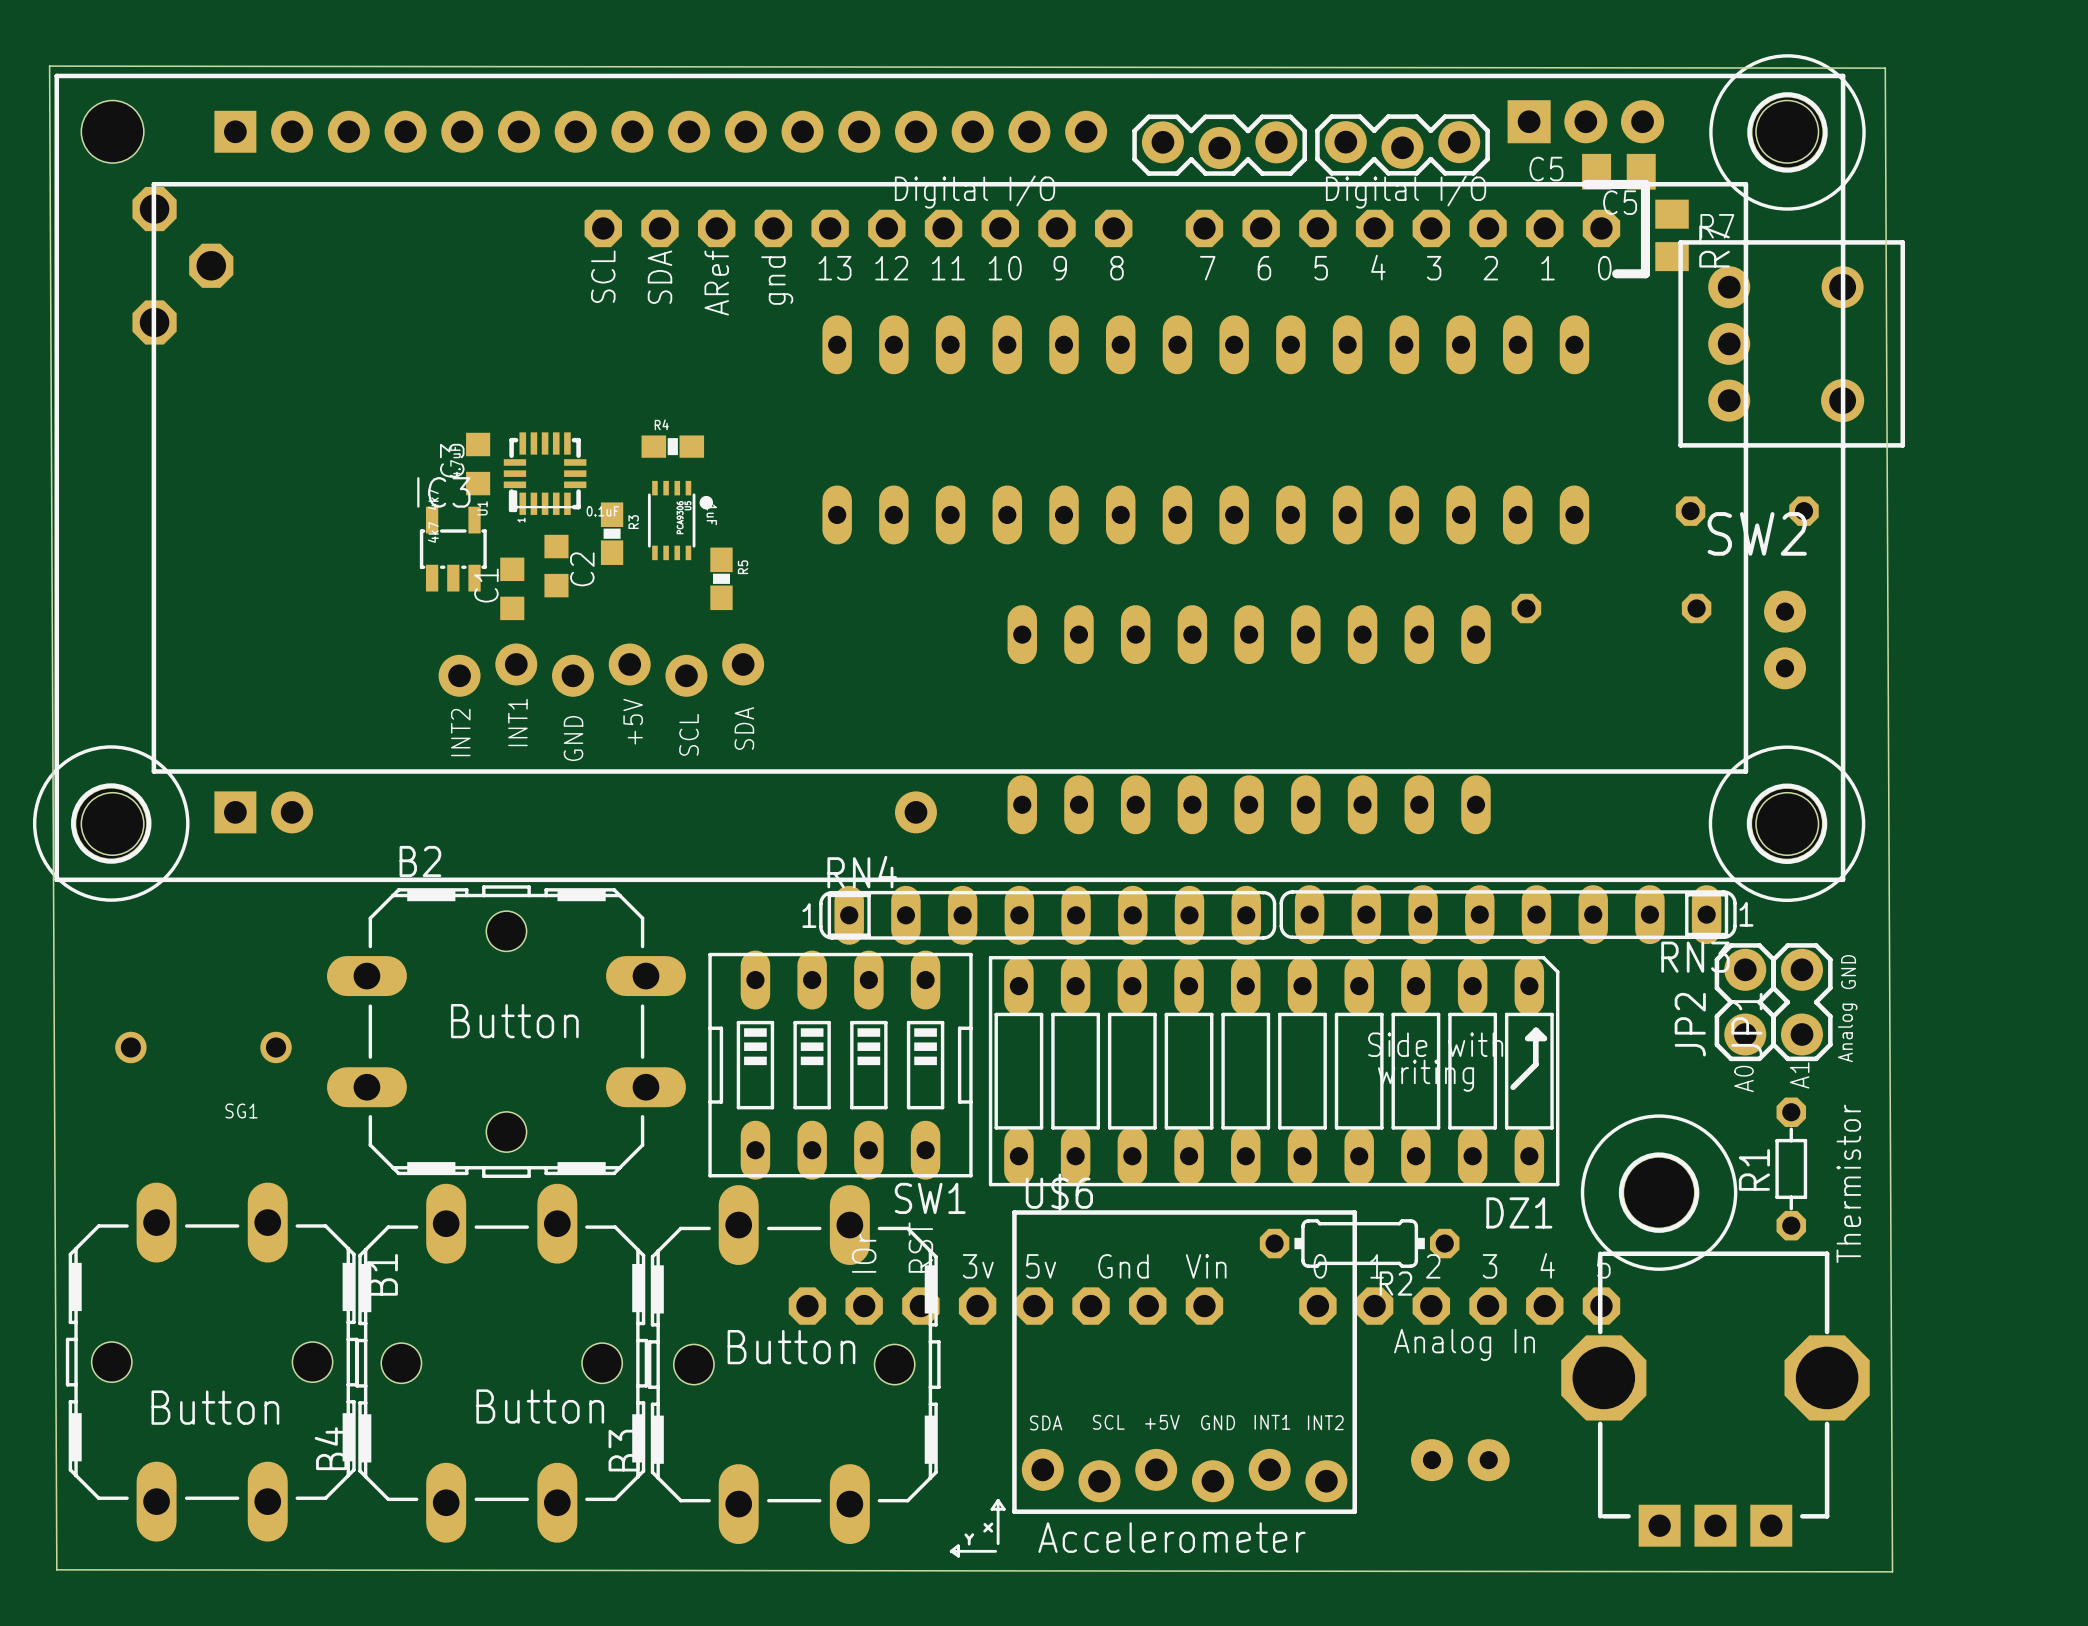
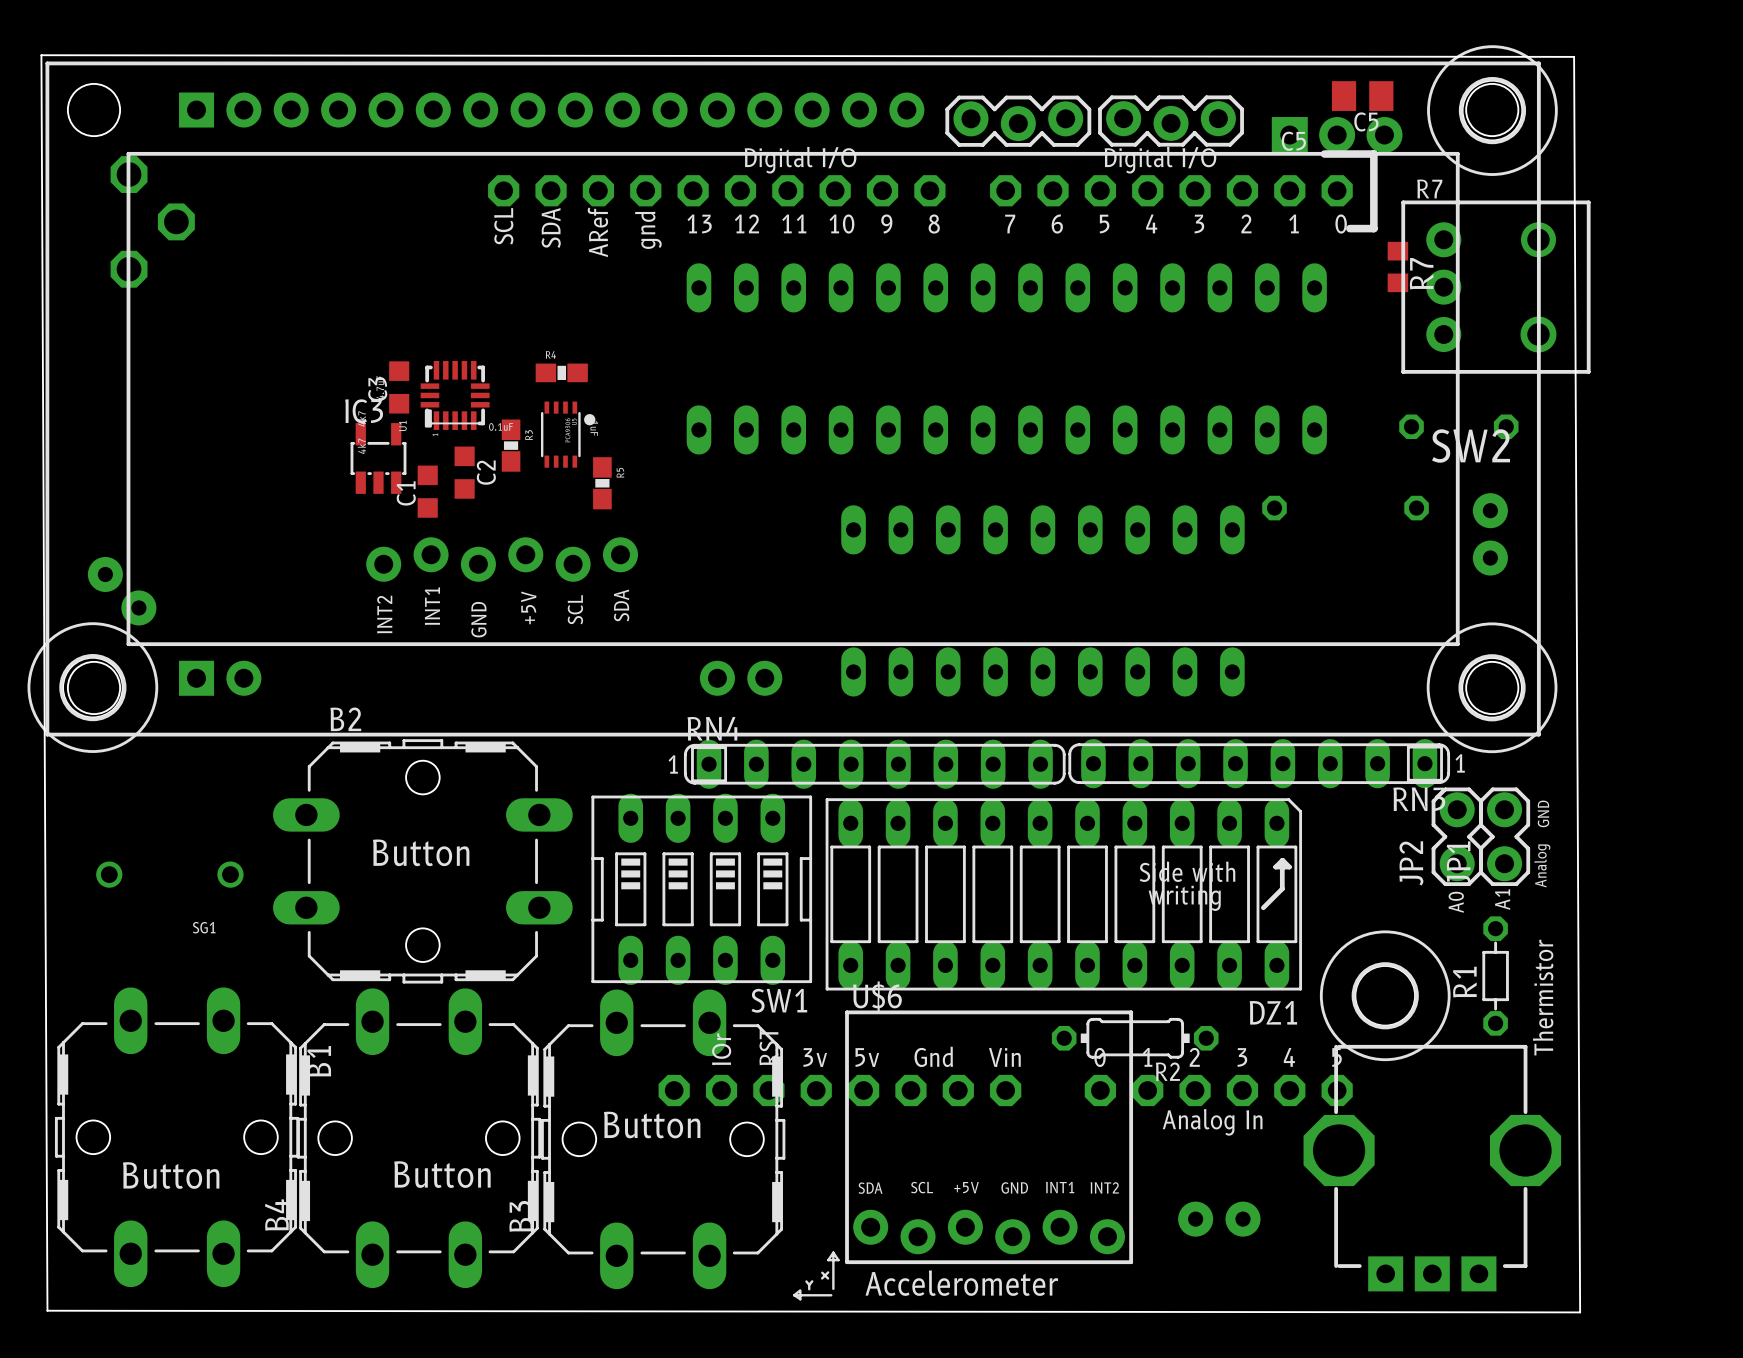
part footprint: [54, 73, 1846, 883] -> [45, 61, 1541, 737]
part position: (1585, 121) -> (1337, 135)
C5 position: (1618, 171) -> (1362, 96)
R7 footprint: [1655, 199, 1689, 272] -> [1387, 241, 1409, 293]
part: none -> (122, 591)

